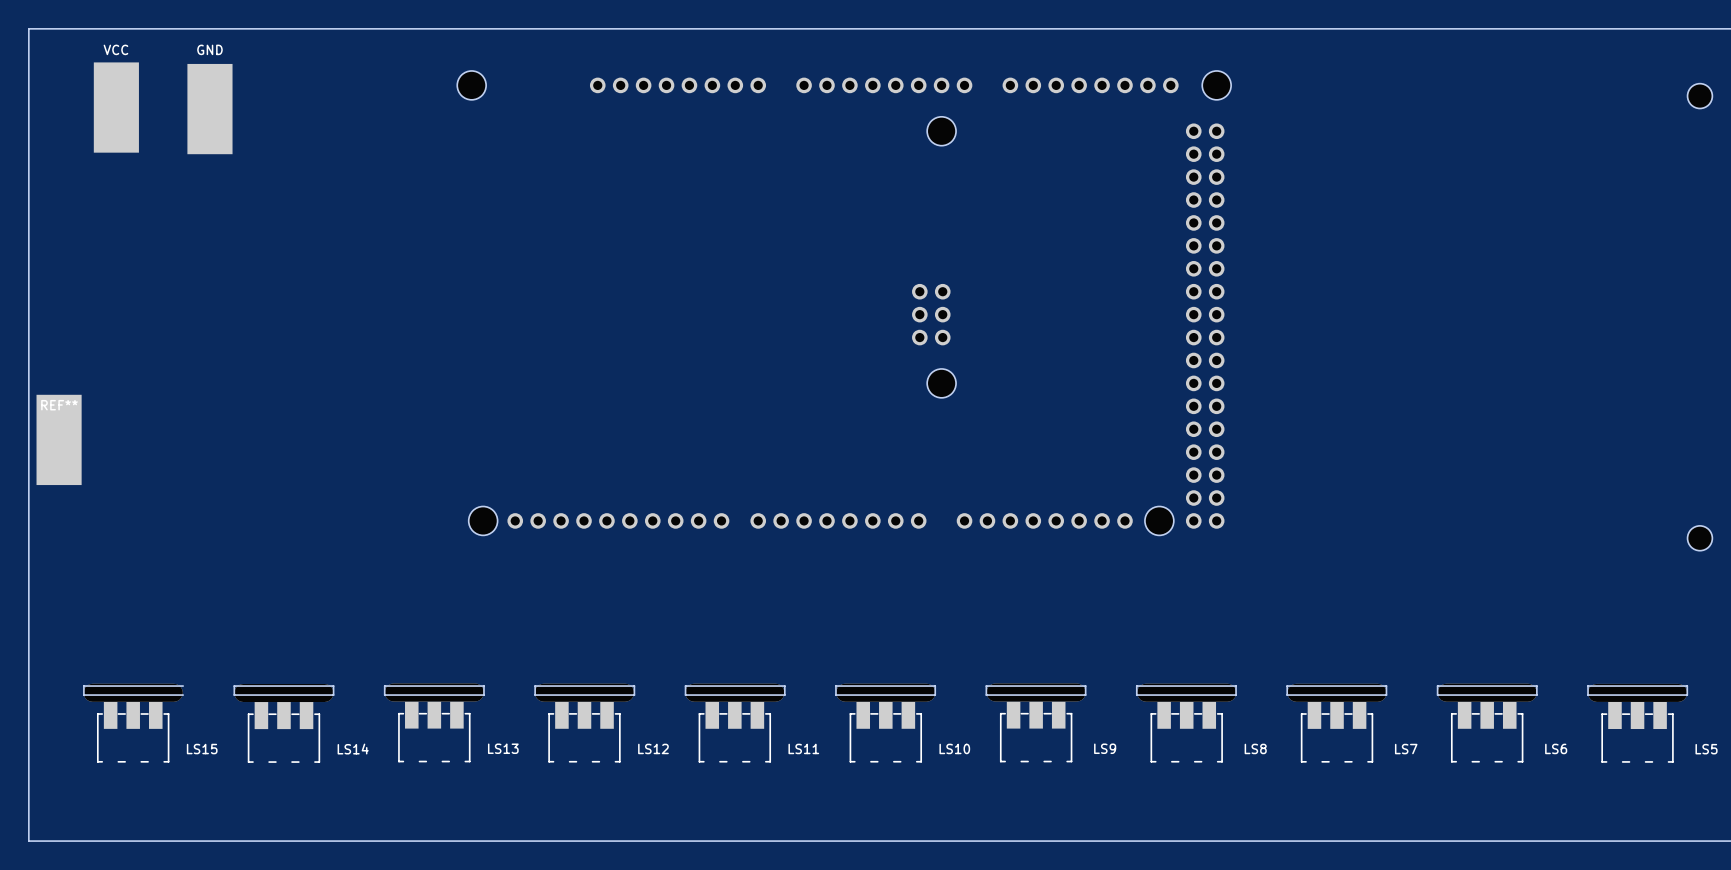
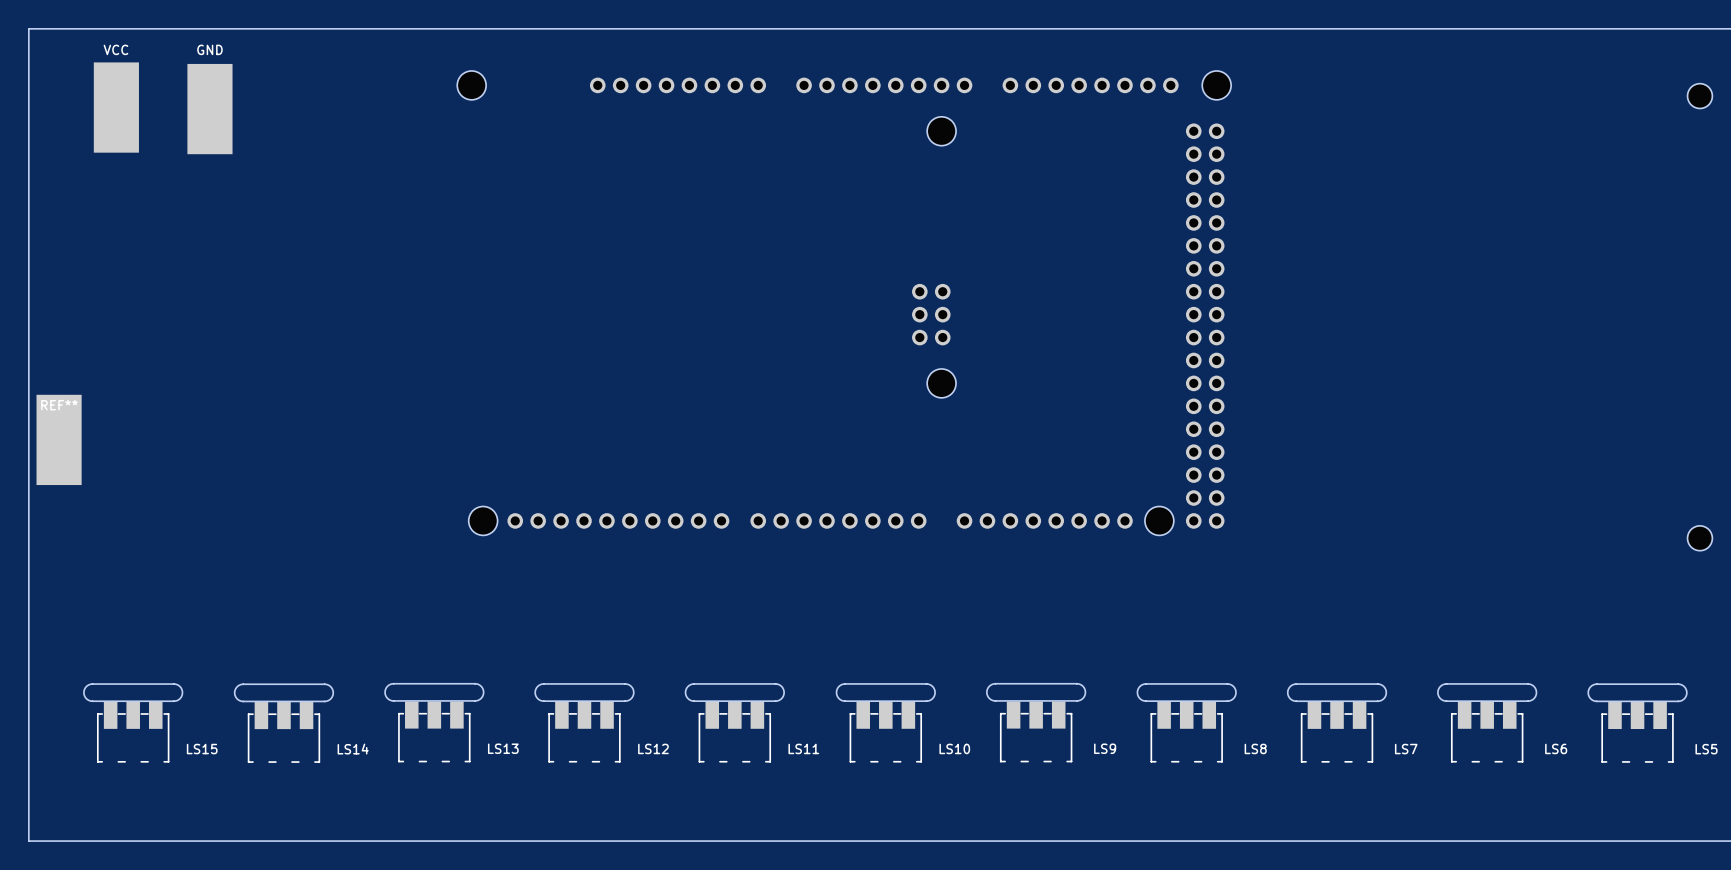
LS15 footprint: [83, 683, 183, 763] -> [83, 683, 184, 763]
LS14 footprint: [234, 683, 334, 763] -> [234, 683, 334, 763]
LS13 footprint: [384, 683, 484, 763] -> [384, 683, 485, 763]
LS12 footprint: [534, 683, 635, 763] -> [534, 683, 635, 763]
LS11 footprint: [685, 683, 785, 763] -> [685, 683, 785, 763]
LS10 footprint: [836, 683, 936, 763] -> [835, 683, 936, 763]
LS9 footprint: [986, 683, 1086, 763] -> [986, 683, 1086, 763]
LS8 footprint: [1137, 683, 1237, 763] -> [1136, 683, 1237, 763]
LS7 footprint: [1287, 683, 1387, 763] -> [1287, 683, 1387, 763]
LS6 footprint: [1437, 683, 1537, 763] -> [1437, 683, 1538, 763]
LS5 footprint: [1587, 683, 1688, 763] -> [1587, 683, 1688, 763]
board edge: (183, 686) (83, 686) (83, 695) (183, 695) -> none
board edge: (234, 686) (333, 686) (333, 695) (234, 695) (234, 686) -> none
board edge: (384, 686) (483, 686) (483, 695) (384, 695) (384, 686) -> none
board edge: (535, 686) (634, 686) (634, 695) (535, 695) (535, 686) -> none
board edge: (685, 686) (784, 686) (784, 695) (685, 695) (685, 686) -> none
board edge: (835, 686) (935, 686) (935, 695) (835, 695) (835, 686) -> none
board edge: (986, 686) (1085, 686) (1085, 695) (986, 695) (986, 686) -> none
board edge: (1136, 686) (1236, 686) (1236, 695) (1136, 695) (1136, 686) -> none
board edge: (1287, 686) (1386, 686) (1386, 695) (1287, 695) (1287, 686) -> none
board edge: (1437, 686) (1536, 686) (1536, 695) (1437, 695) (1437, 686) -> none
board edge: (1588, 686) (1687, 686) (1687, 695) (1588, 695) (1588, 686) -> none

